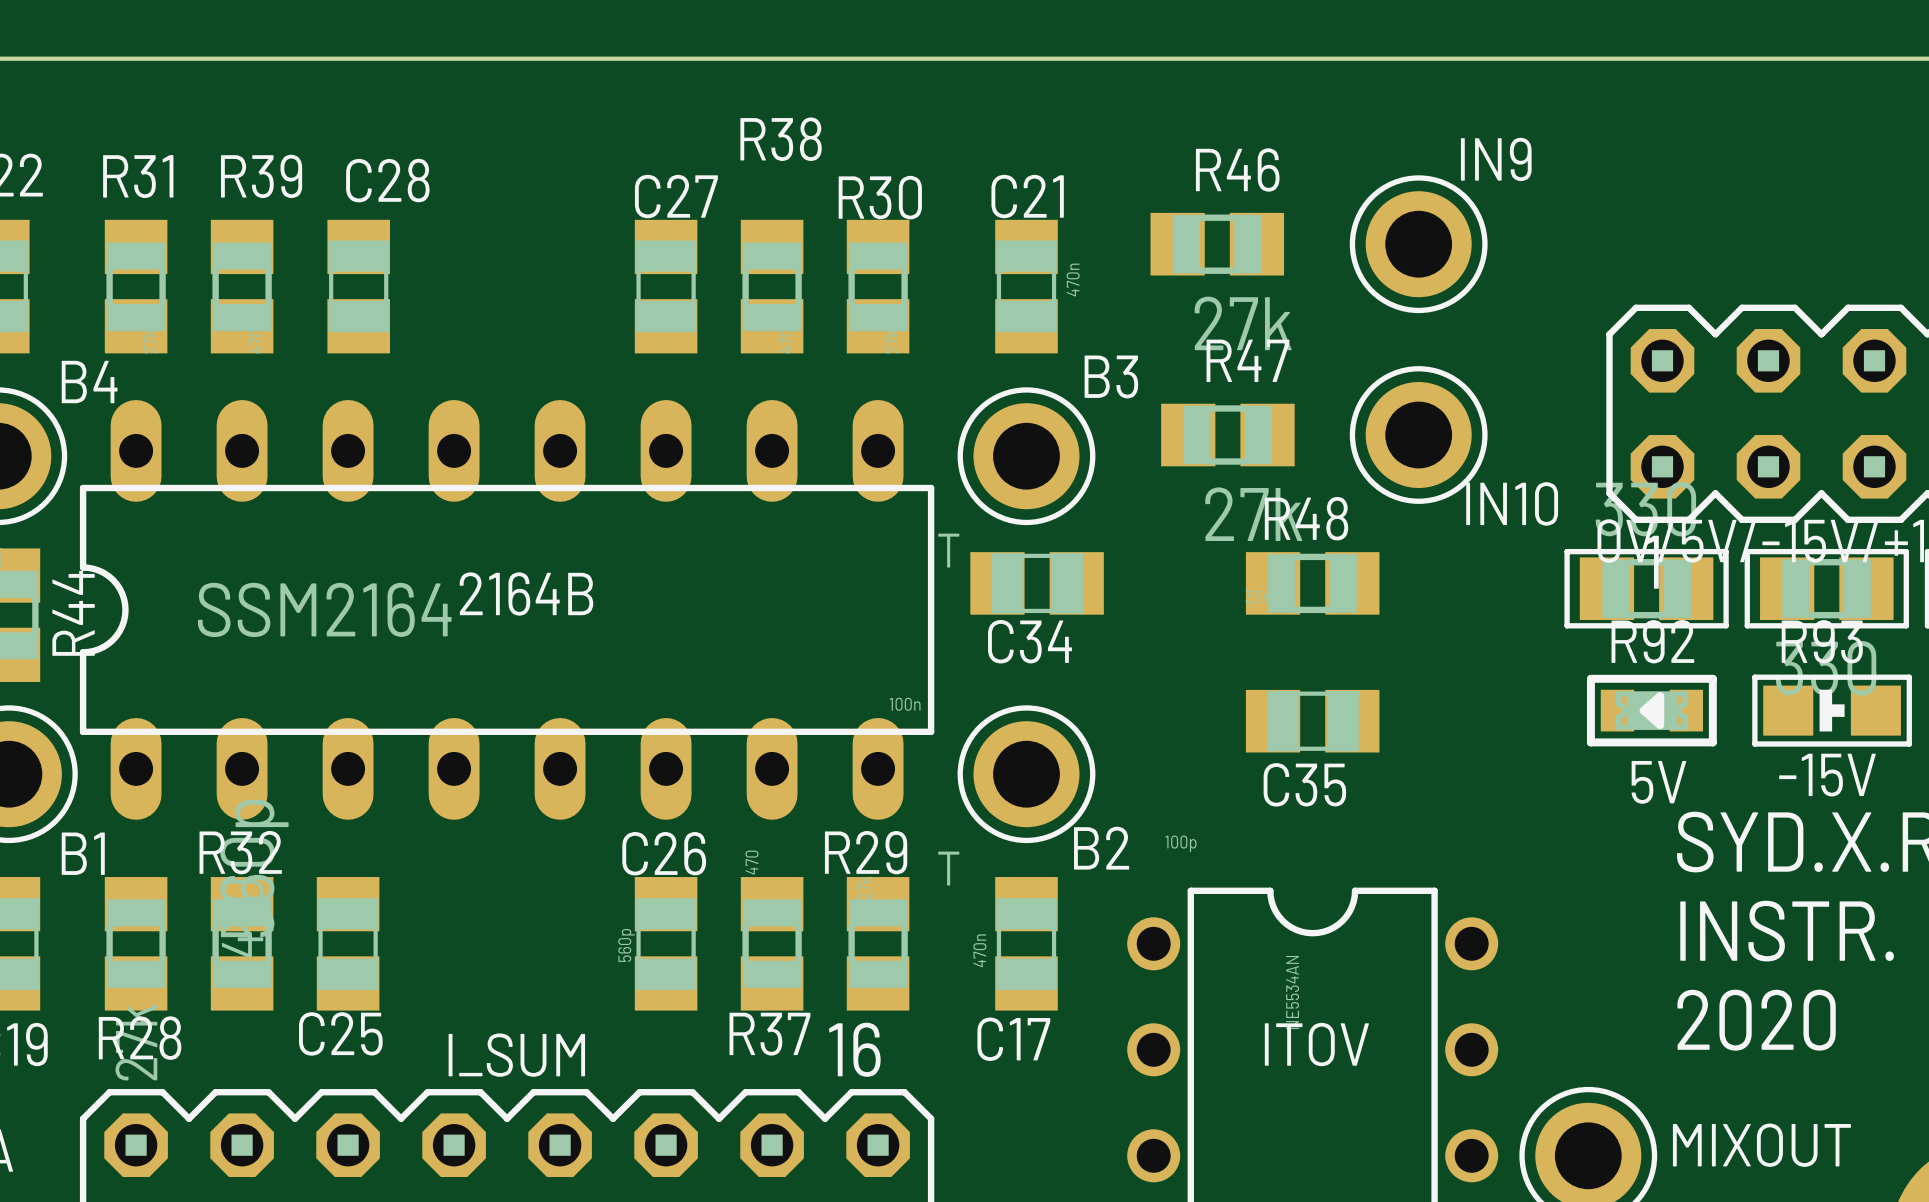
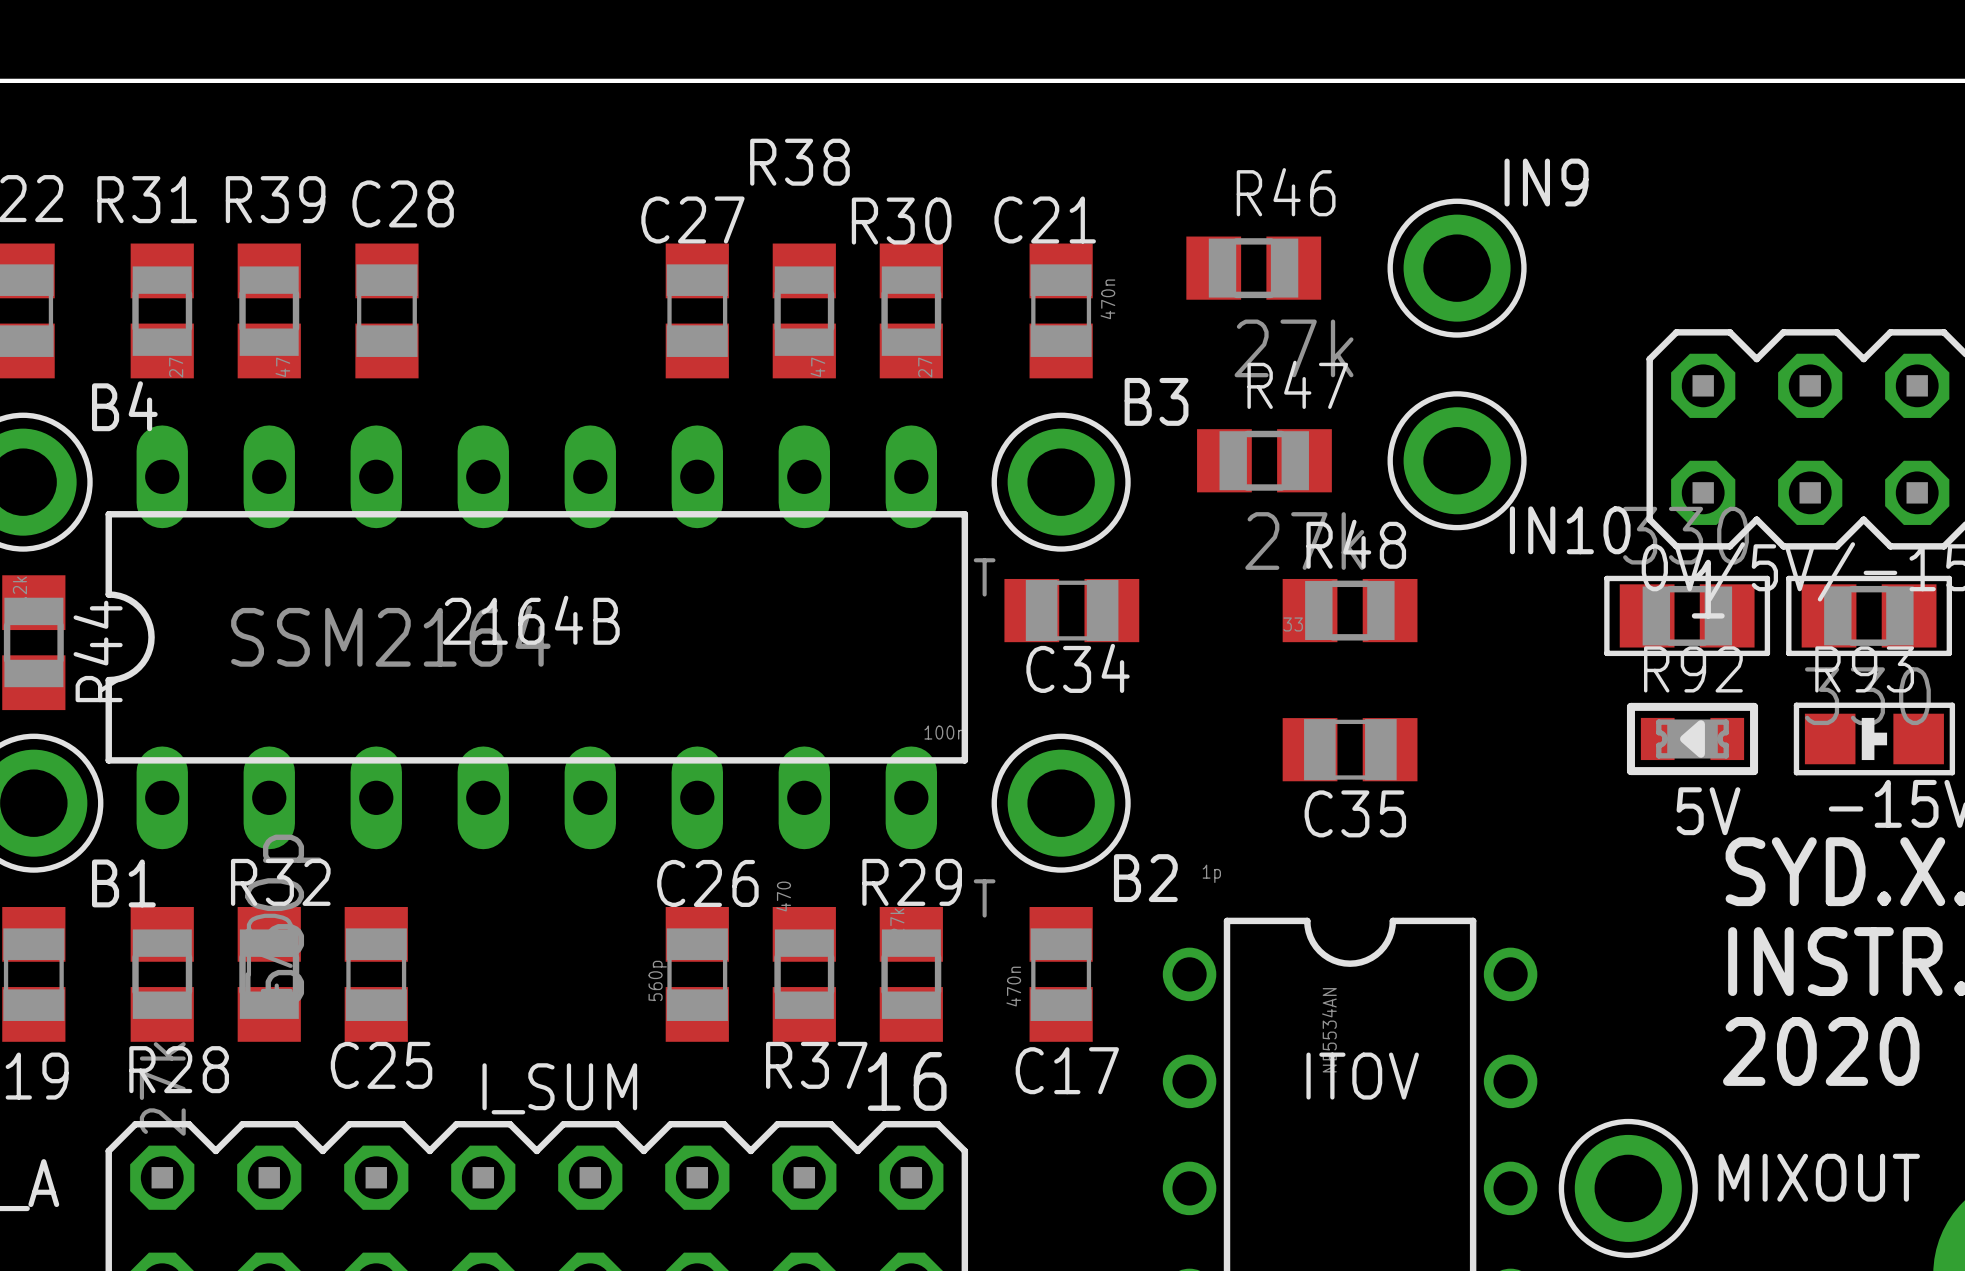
C35 value: 100p (1180, 843) -> 1p (1211, 873)

